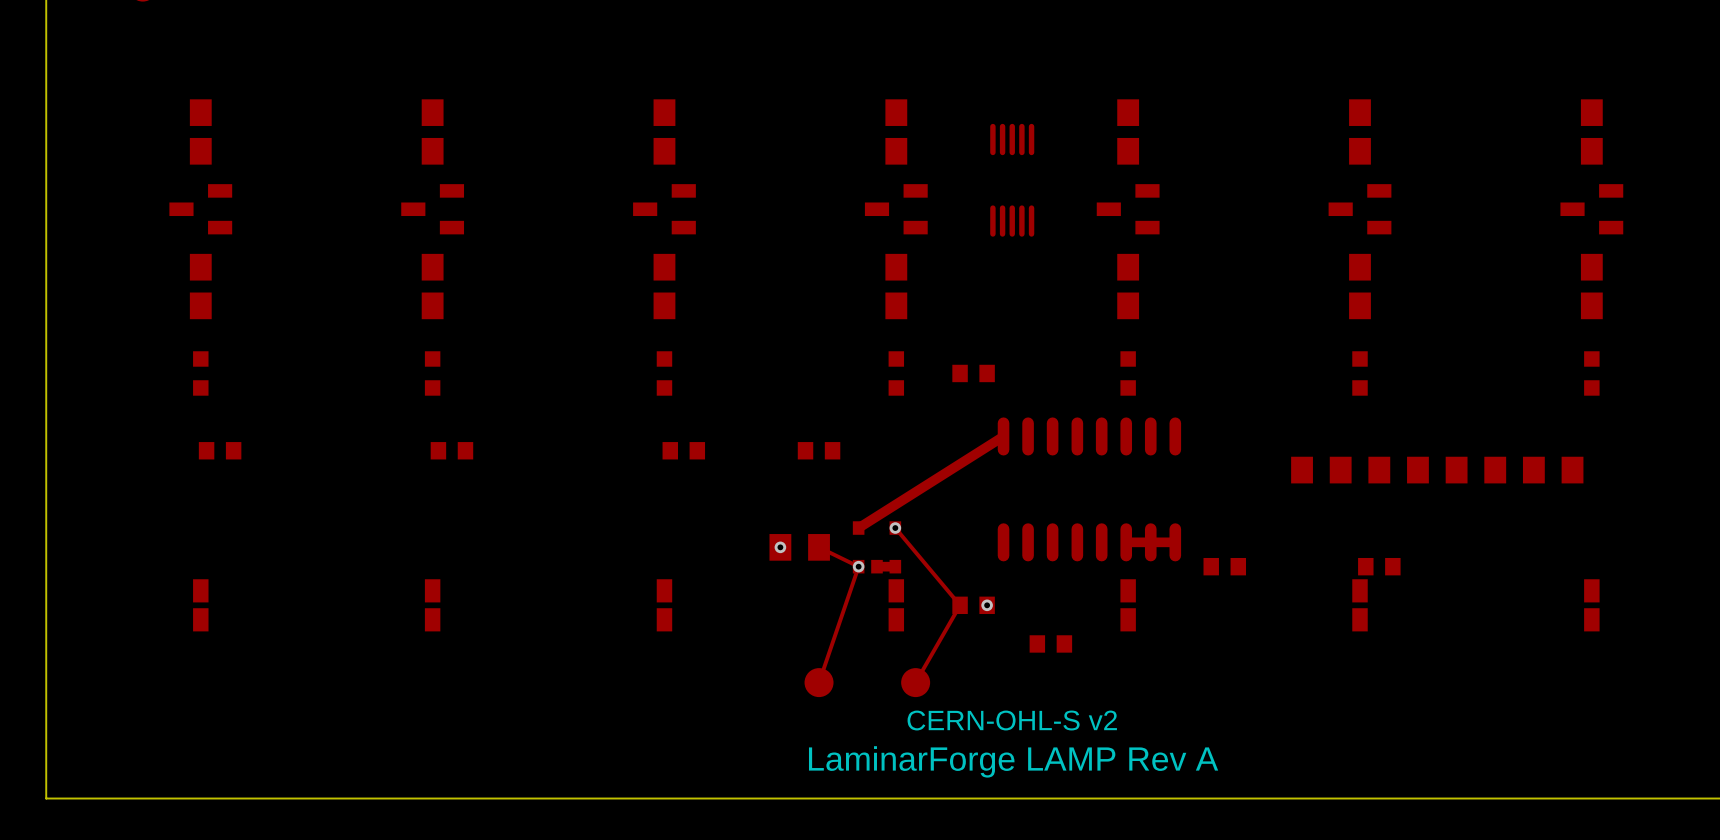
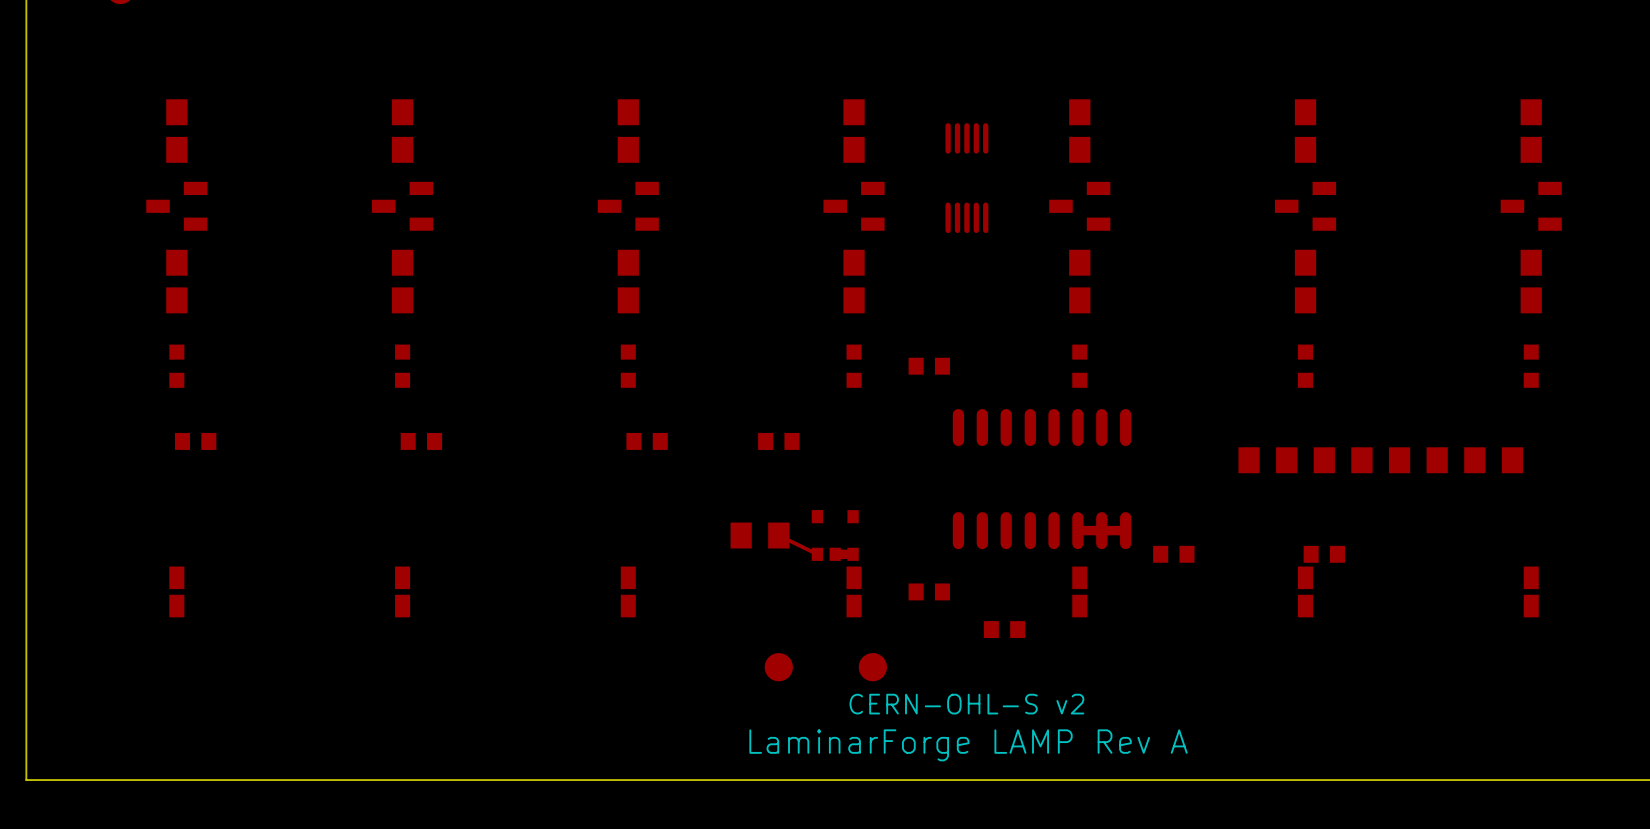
track: (1003, 436) (858, 528) -> none
track: (895, 528) (960, 605) (915, 682) -> none
via: (895, 528) -> none
via: (780, 547) -> none
track: (858, 566) (819, 682) -> none
via: (858, 566) -> none
via: (987, 605) -> none

